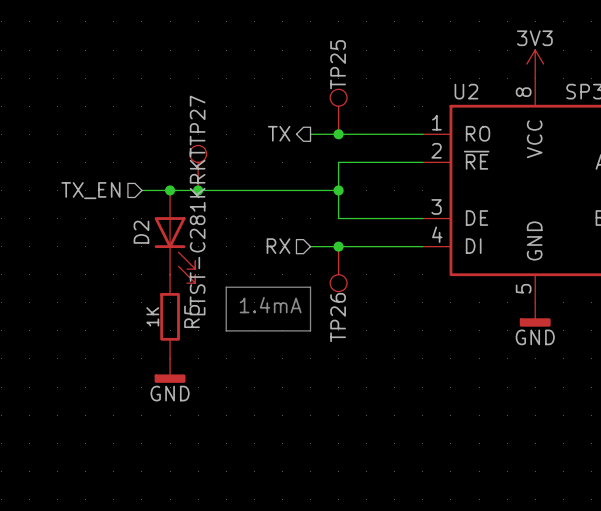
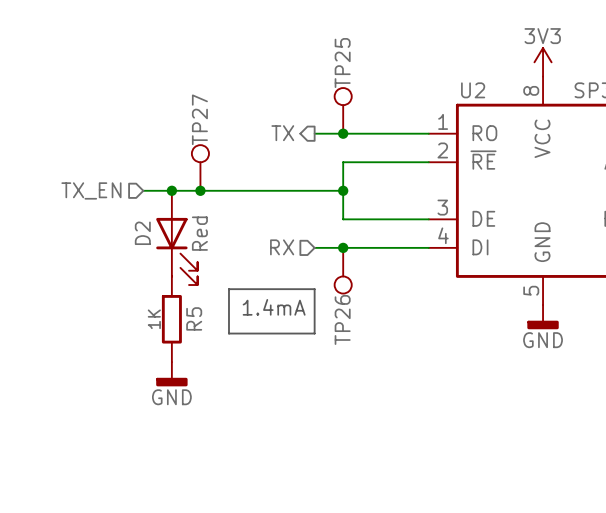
D2 value: LTST-C281KRKT (197, 231) -> none
D2 text: none -> Red (199, 233)

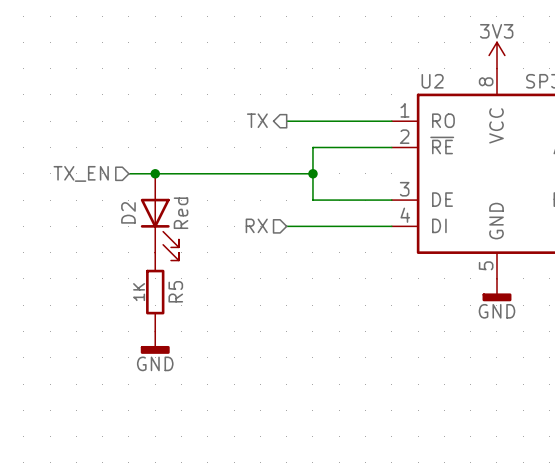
TP25: (343, 110) -> none
junction: (343, 133) -> none
TP27: (200, 167) -> none
junction: (200, 190) -> none
junction: (343, 247) -> none
TP26: (343, 270) -> none
line: (228, 289) (314, 289) (314, 333) (228, 333) (228, 289) -> none
text: 1.4mA (274, 307) -> none

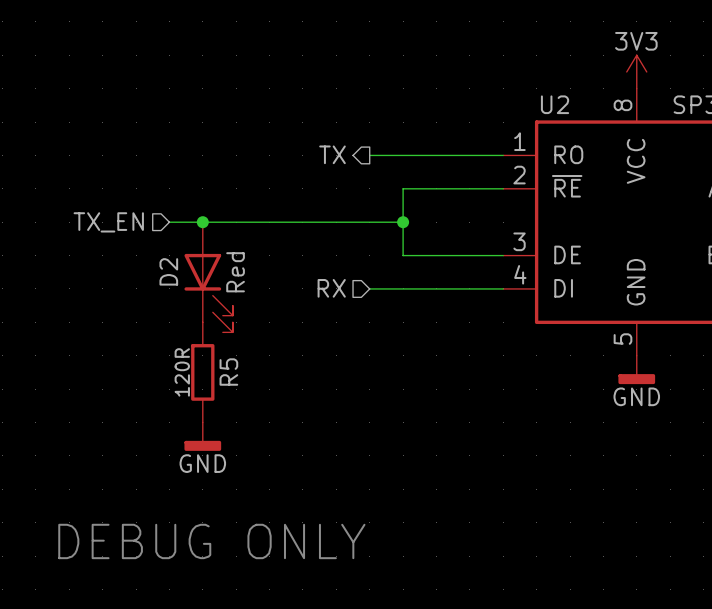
R5 value: 1K (139, 292) -> 120R (182, 372)
text: none -> DEBUG ONLY (211, 541)

